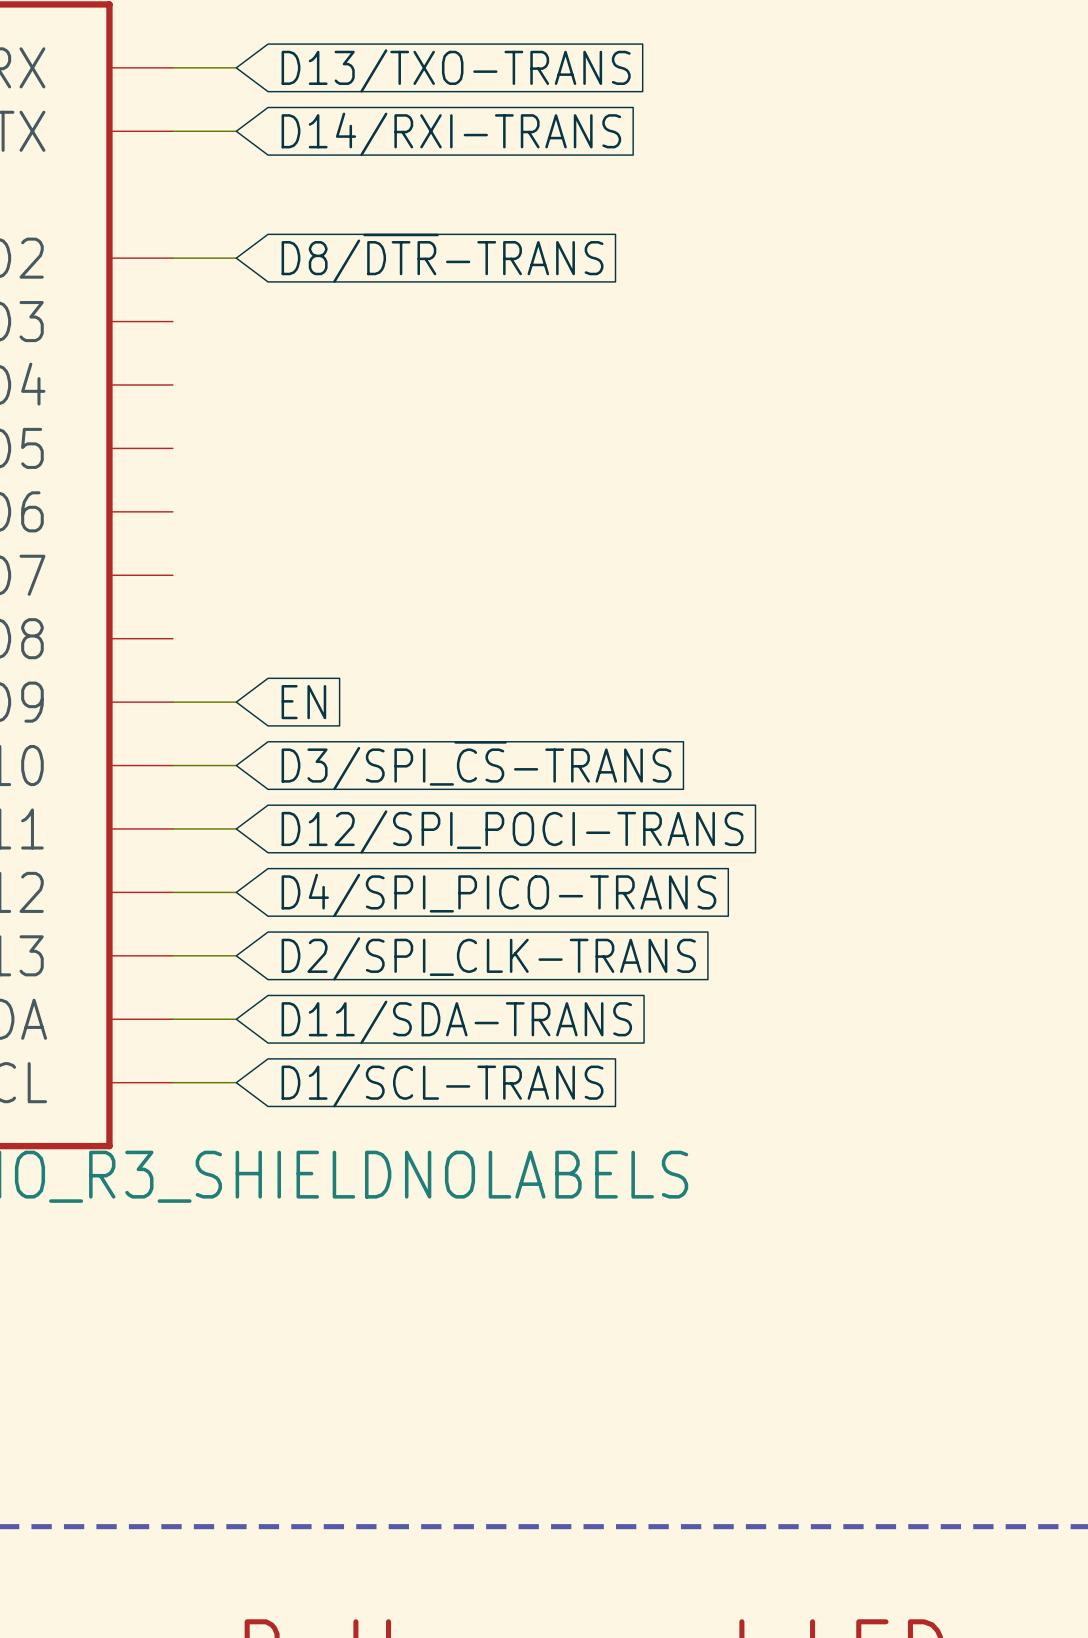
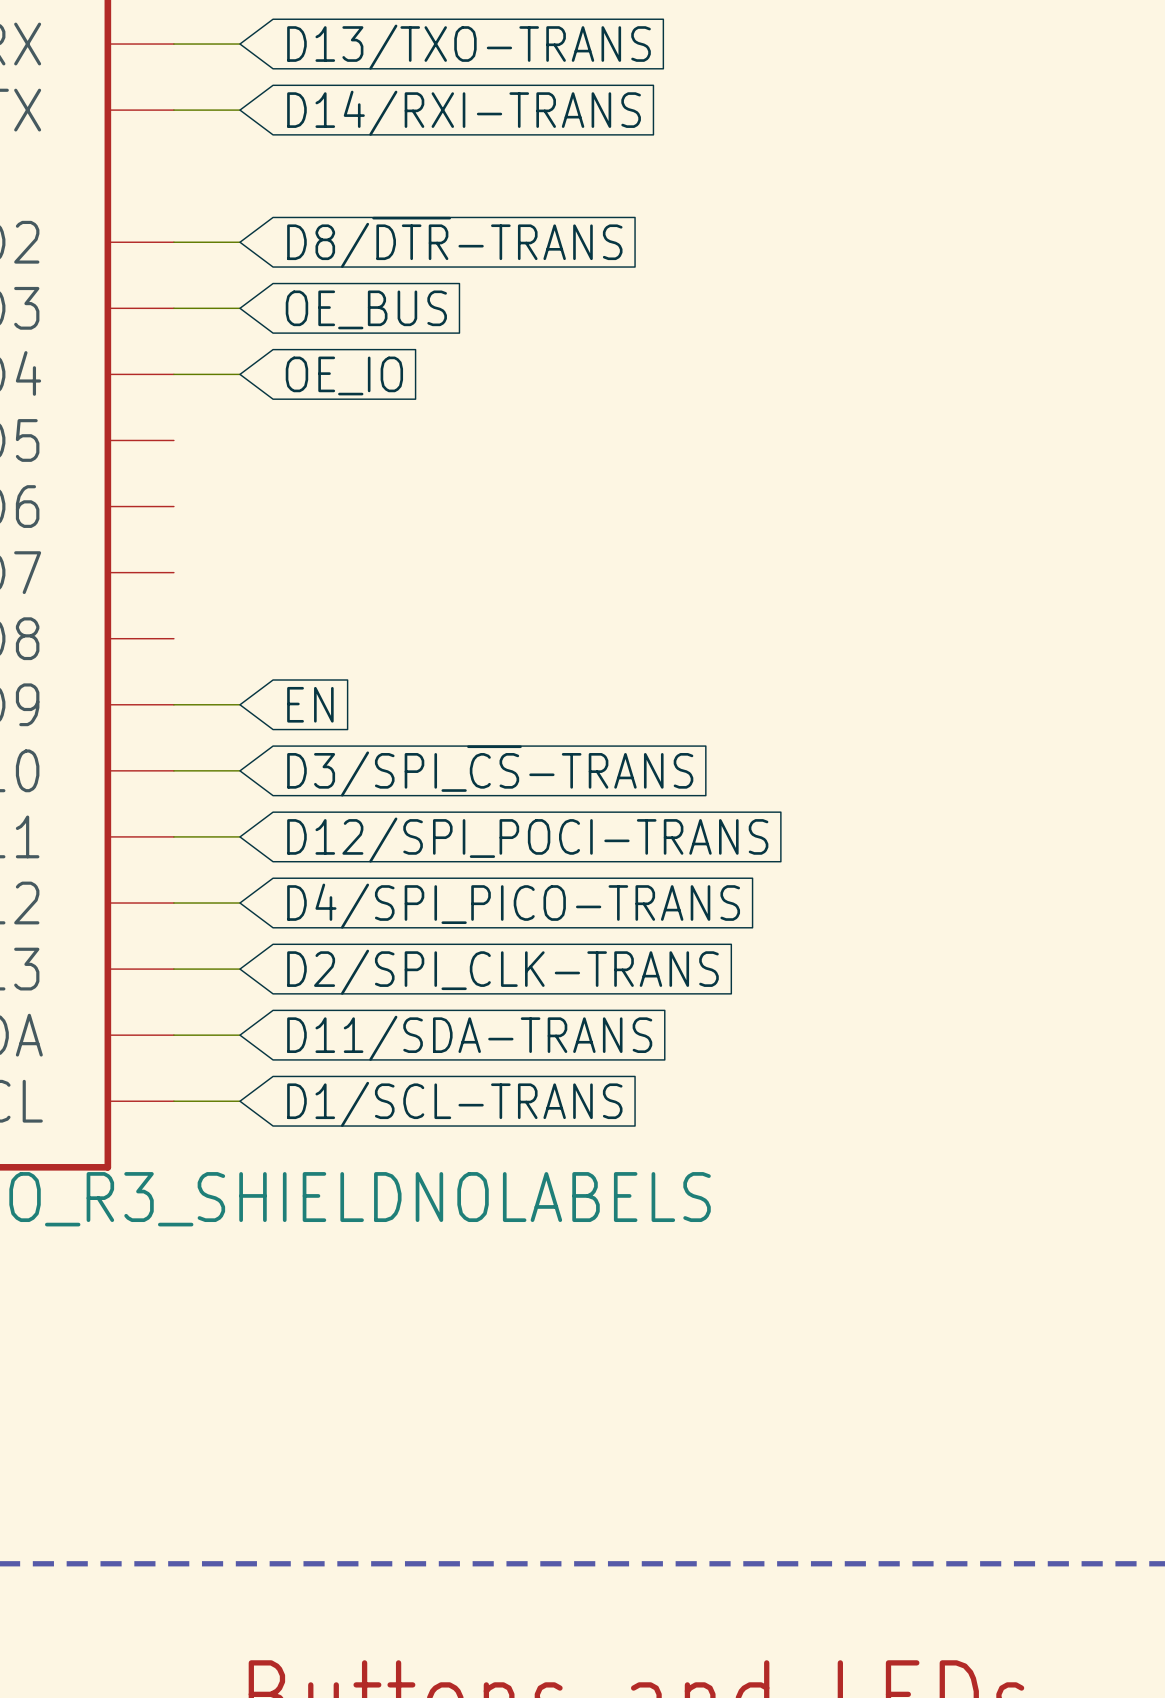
wire: none -> (173, 308) (240, 308)
global label: none -> OE_BUS (366, 309)
wire: none -> (173, 374) (240, 374)
global label: none -> OE_IO (344, 375)

